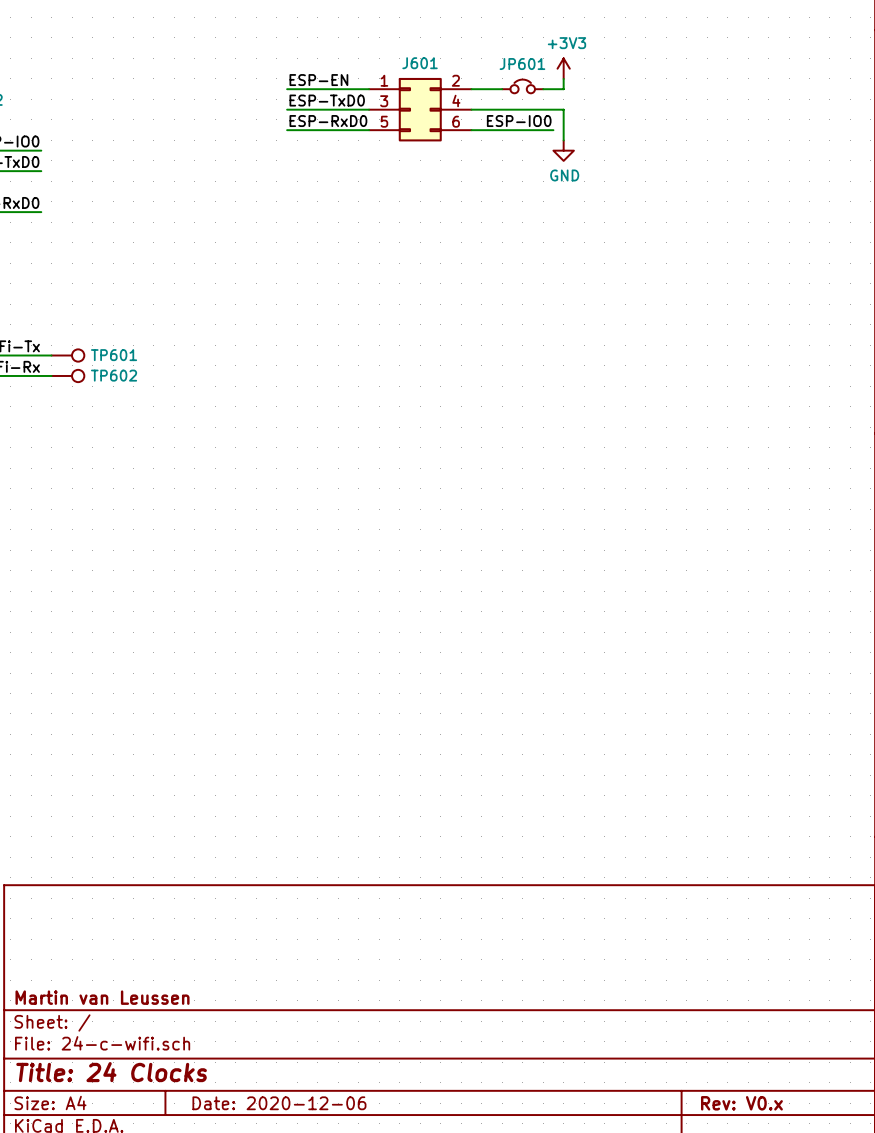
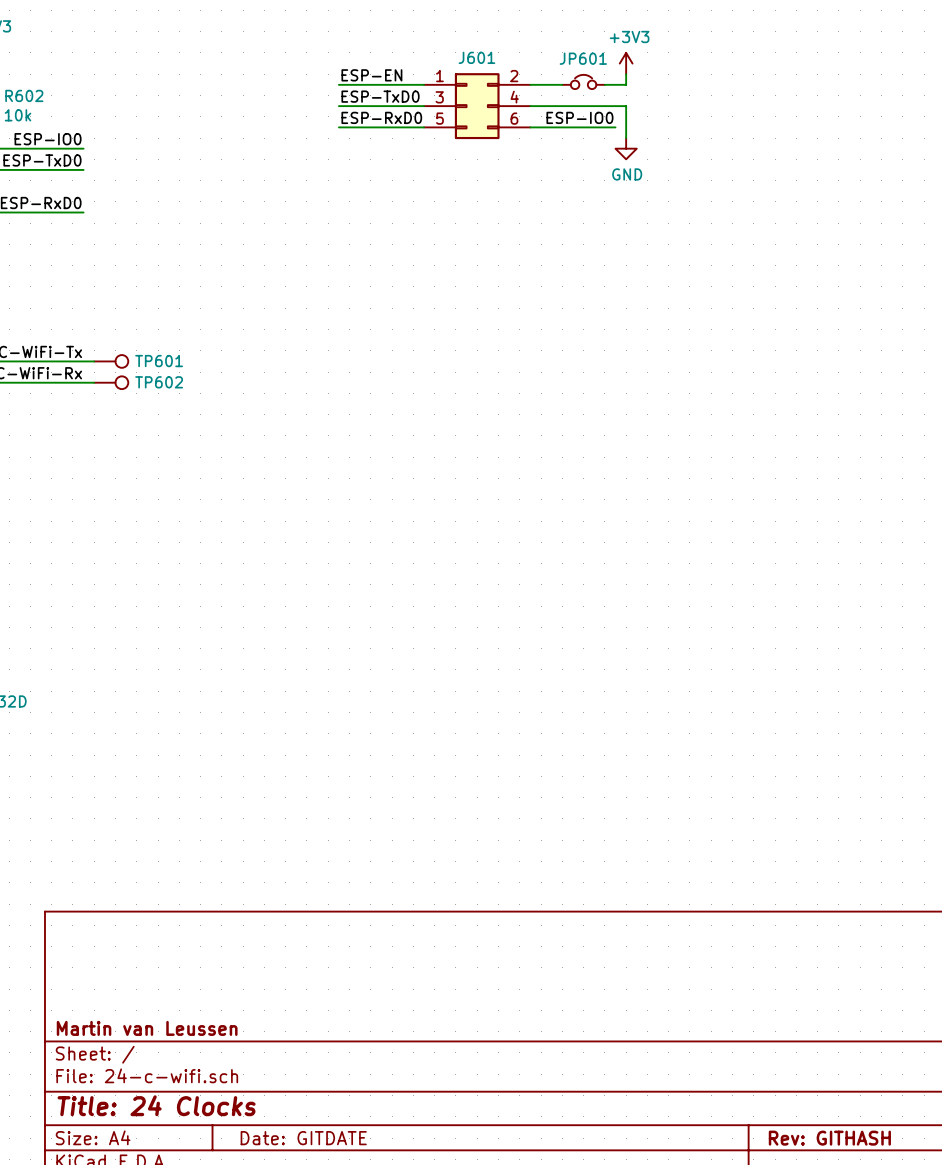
title block: Date: 2020-12-06 (279, 1103) -> Date: GITDATE (303, 1138)
title block: Rev: V0.x (741, 1103) -> Rev: GITHASH (829, 1138)

